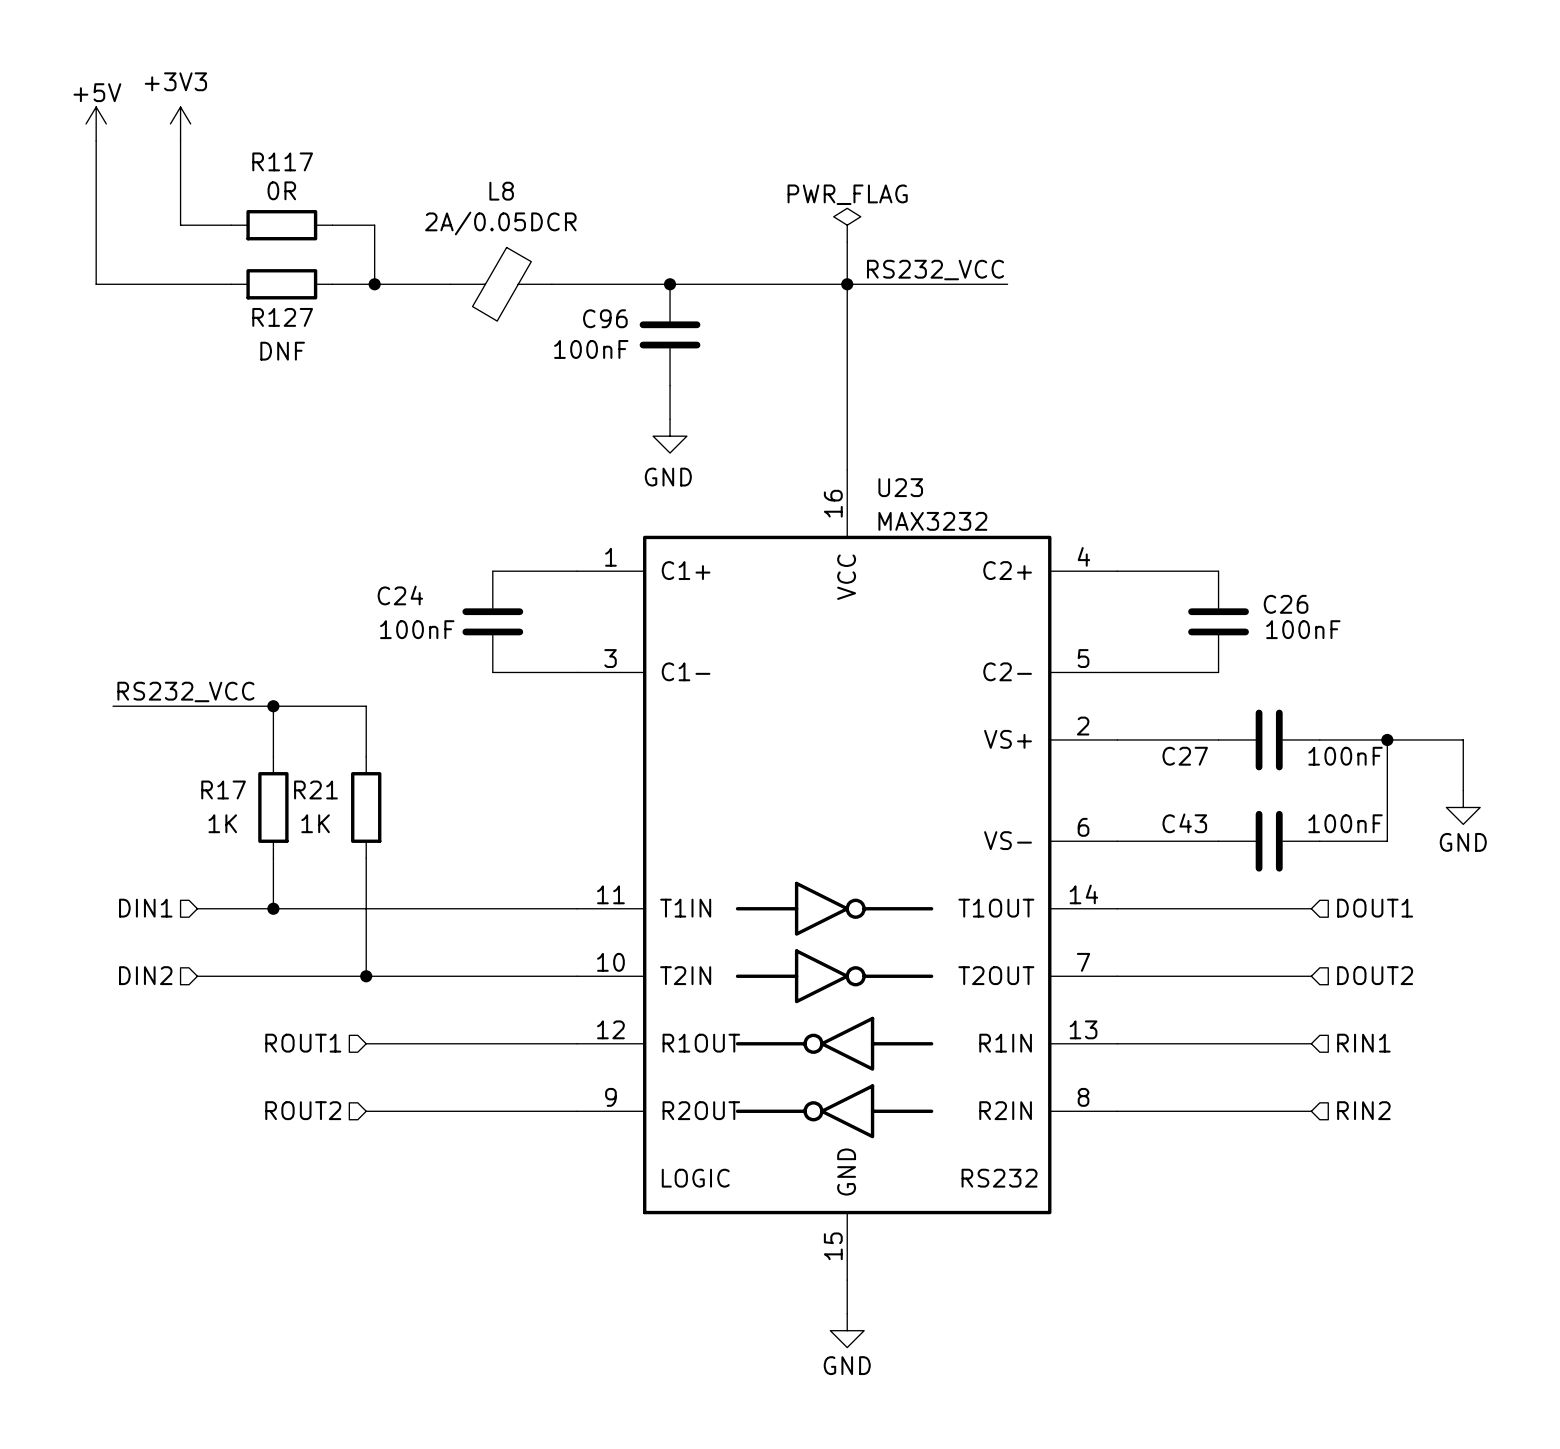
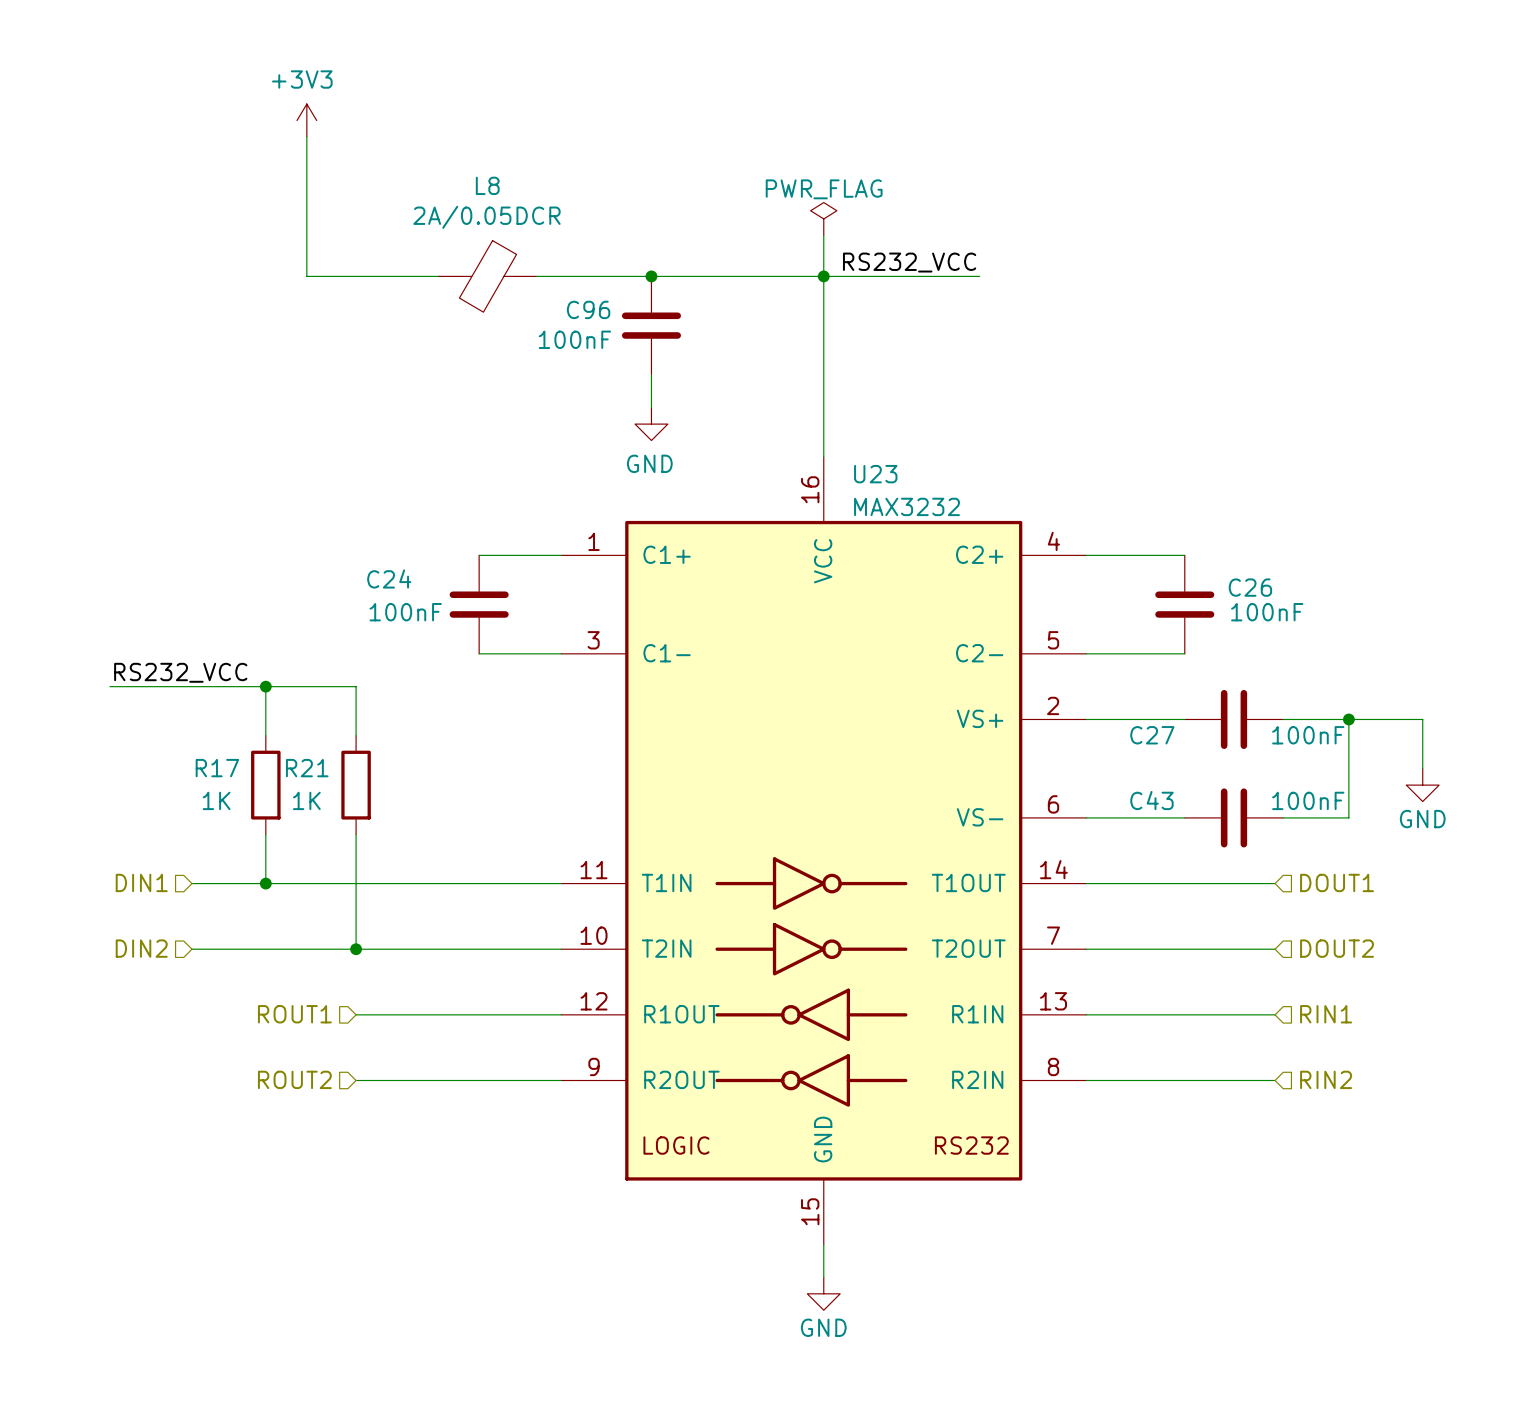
power symbol: +5V (96, 123) -> none
power symbol position: +3V3 (180, 123) -> +3V3 (306, 120)
wire: (96, 140) (96, 284) (231, 284) -> none
wire: (180, 140) (180, 225) (231, 225) -> none
wire: none -> (306, 136) (306, 276) (323, 276)
R117: 0R (281, 225) -> none
wire: (332, 225) (374, 225) (374, 284) -> none
R127: DNF (281, 284) -> none
junction: (374, 284) -> none

